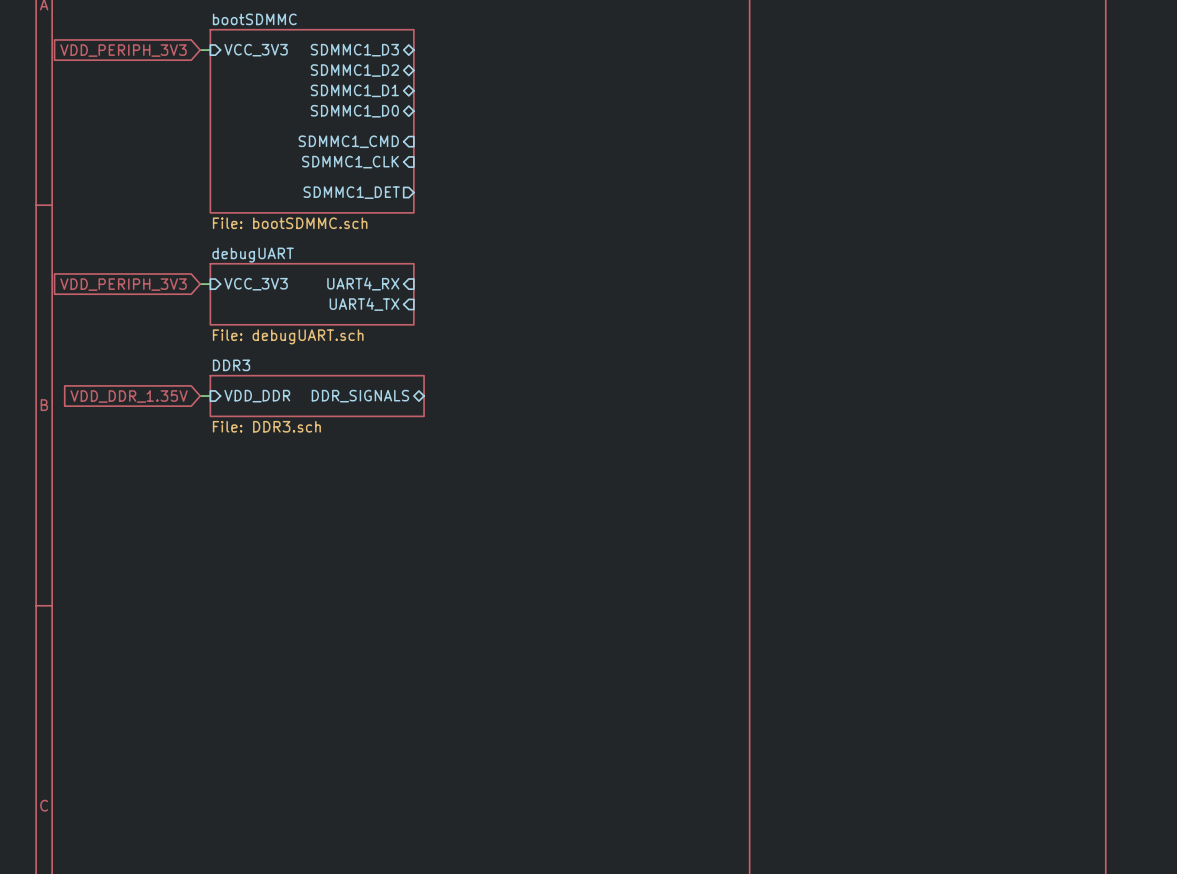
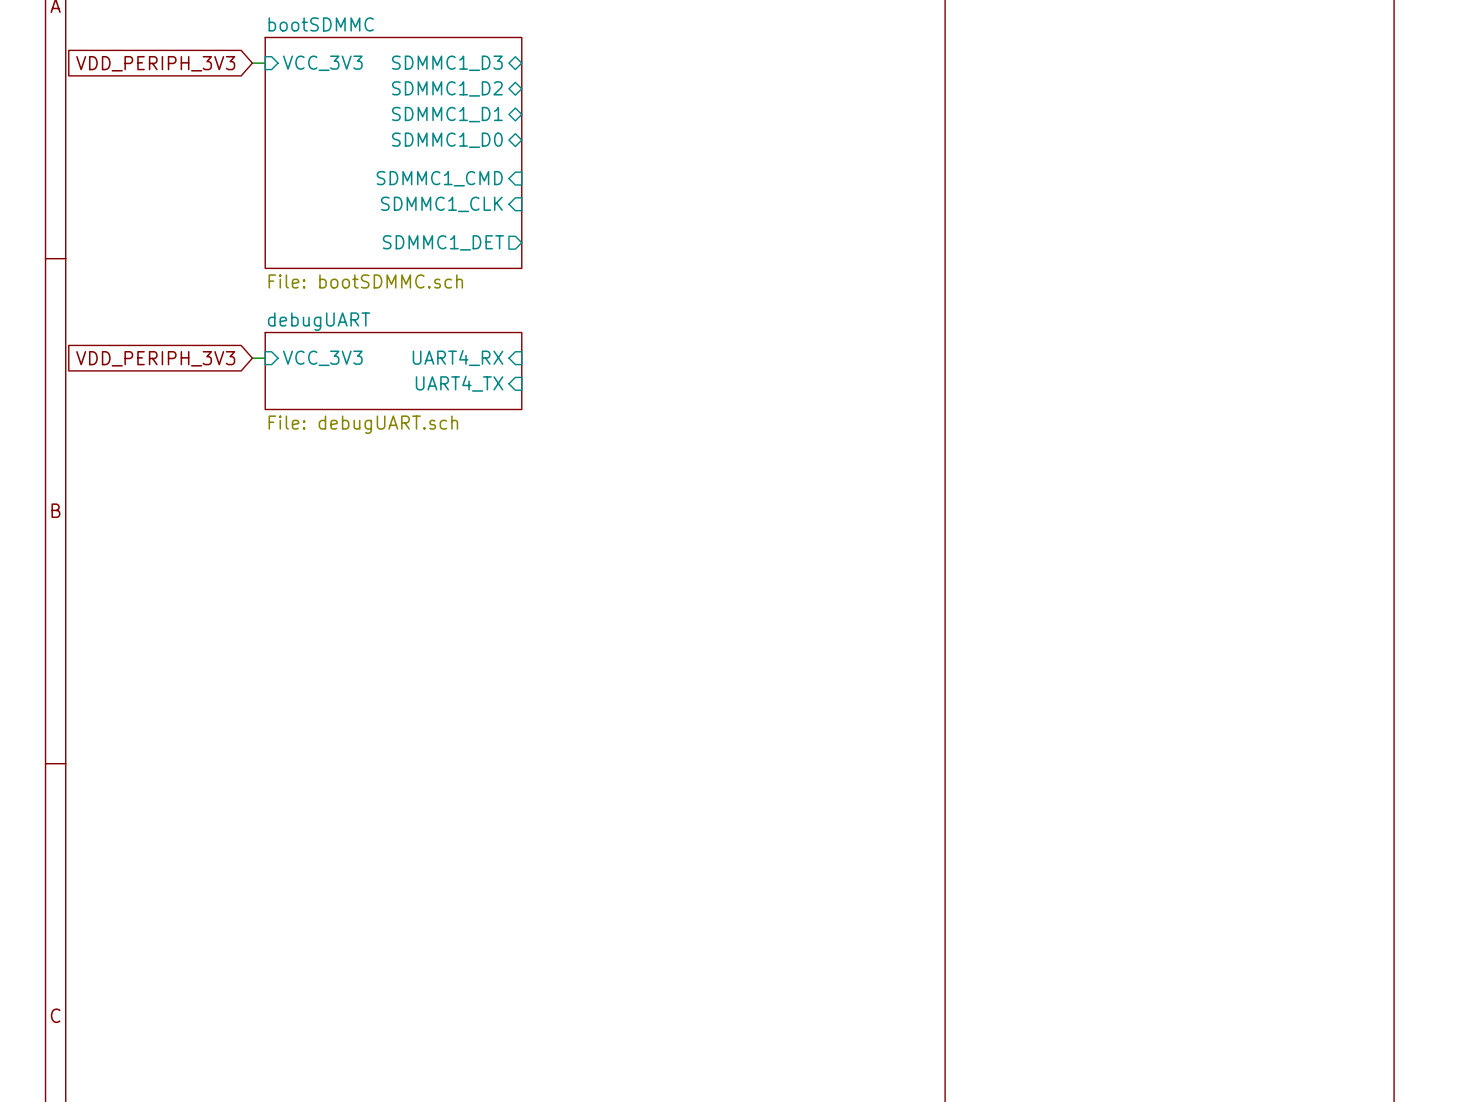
global label: VDD_DDR_1.35V (129, 396) -> none
wire: (200, 396) (210, 396) -> none
sheet pin: VDD_DDR (257, 396) -> none
sheet DDR3: File: DDR3.sch (317, 396) -> none
sheet pin: DDR_SIGNALS (360, 396) -> none

